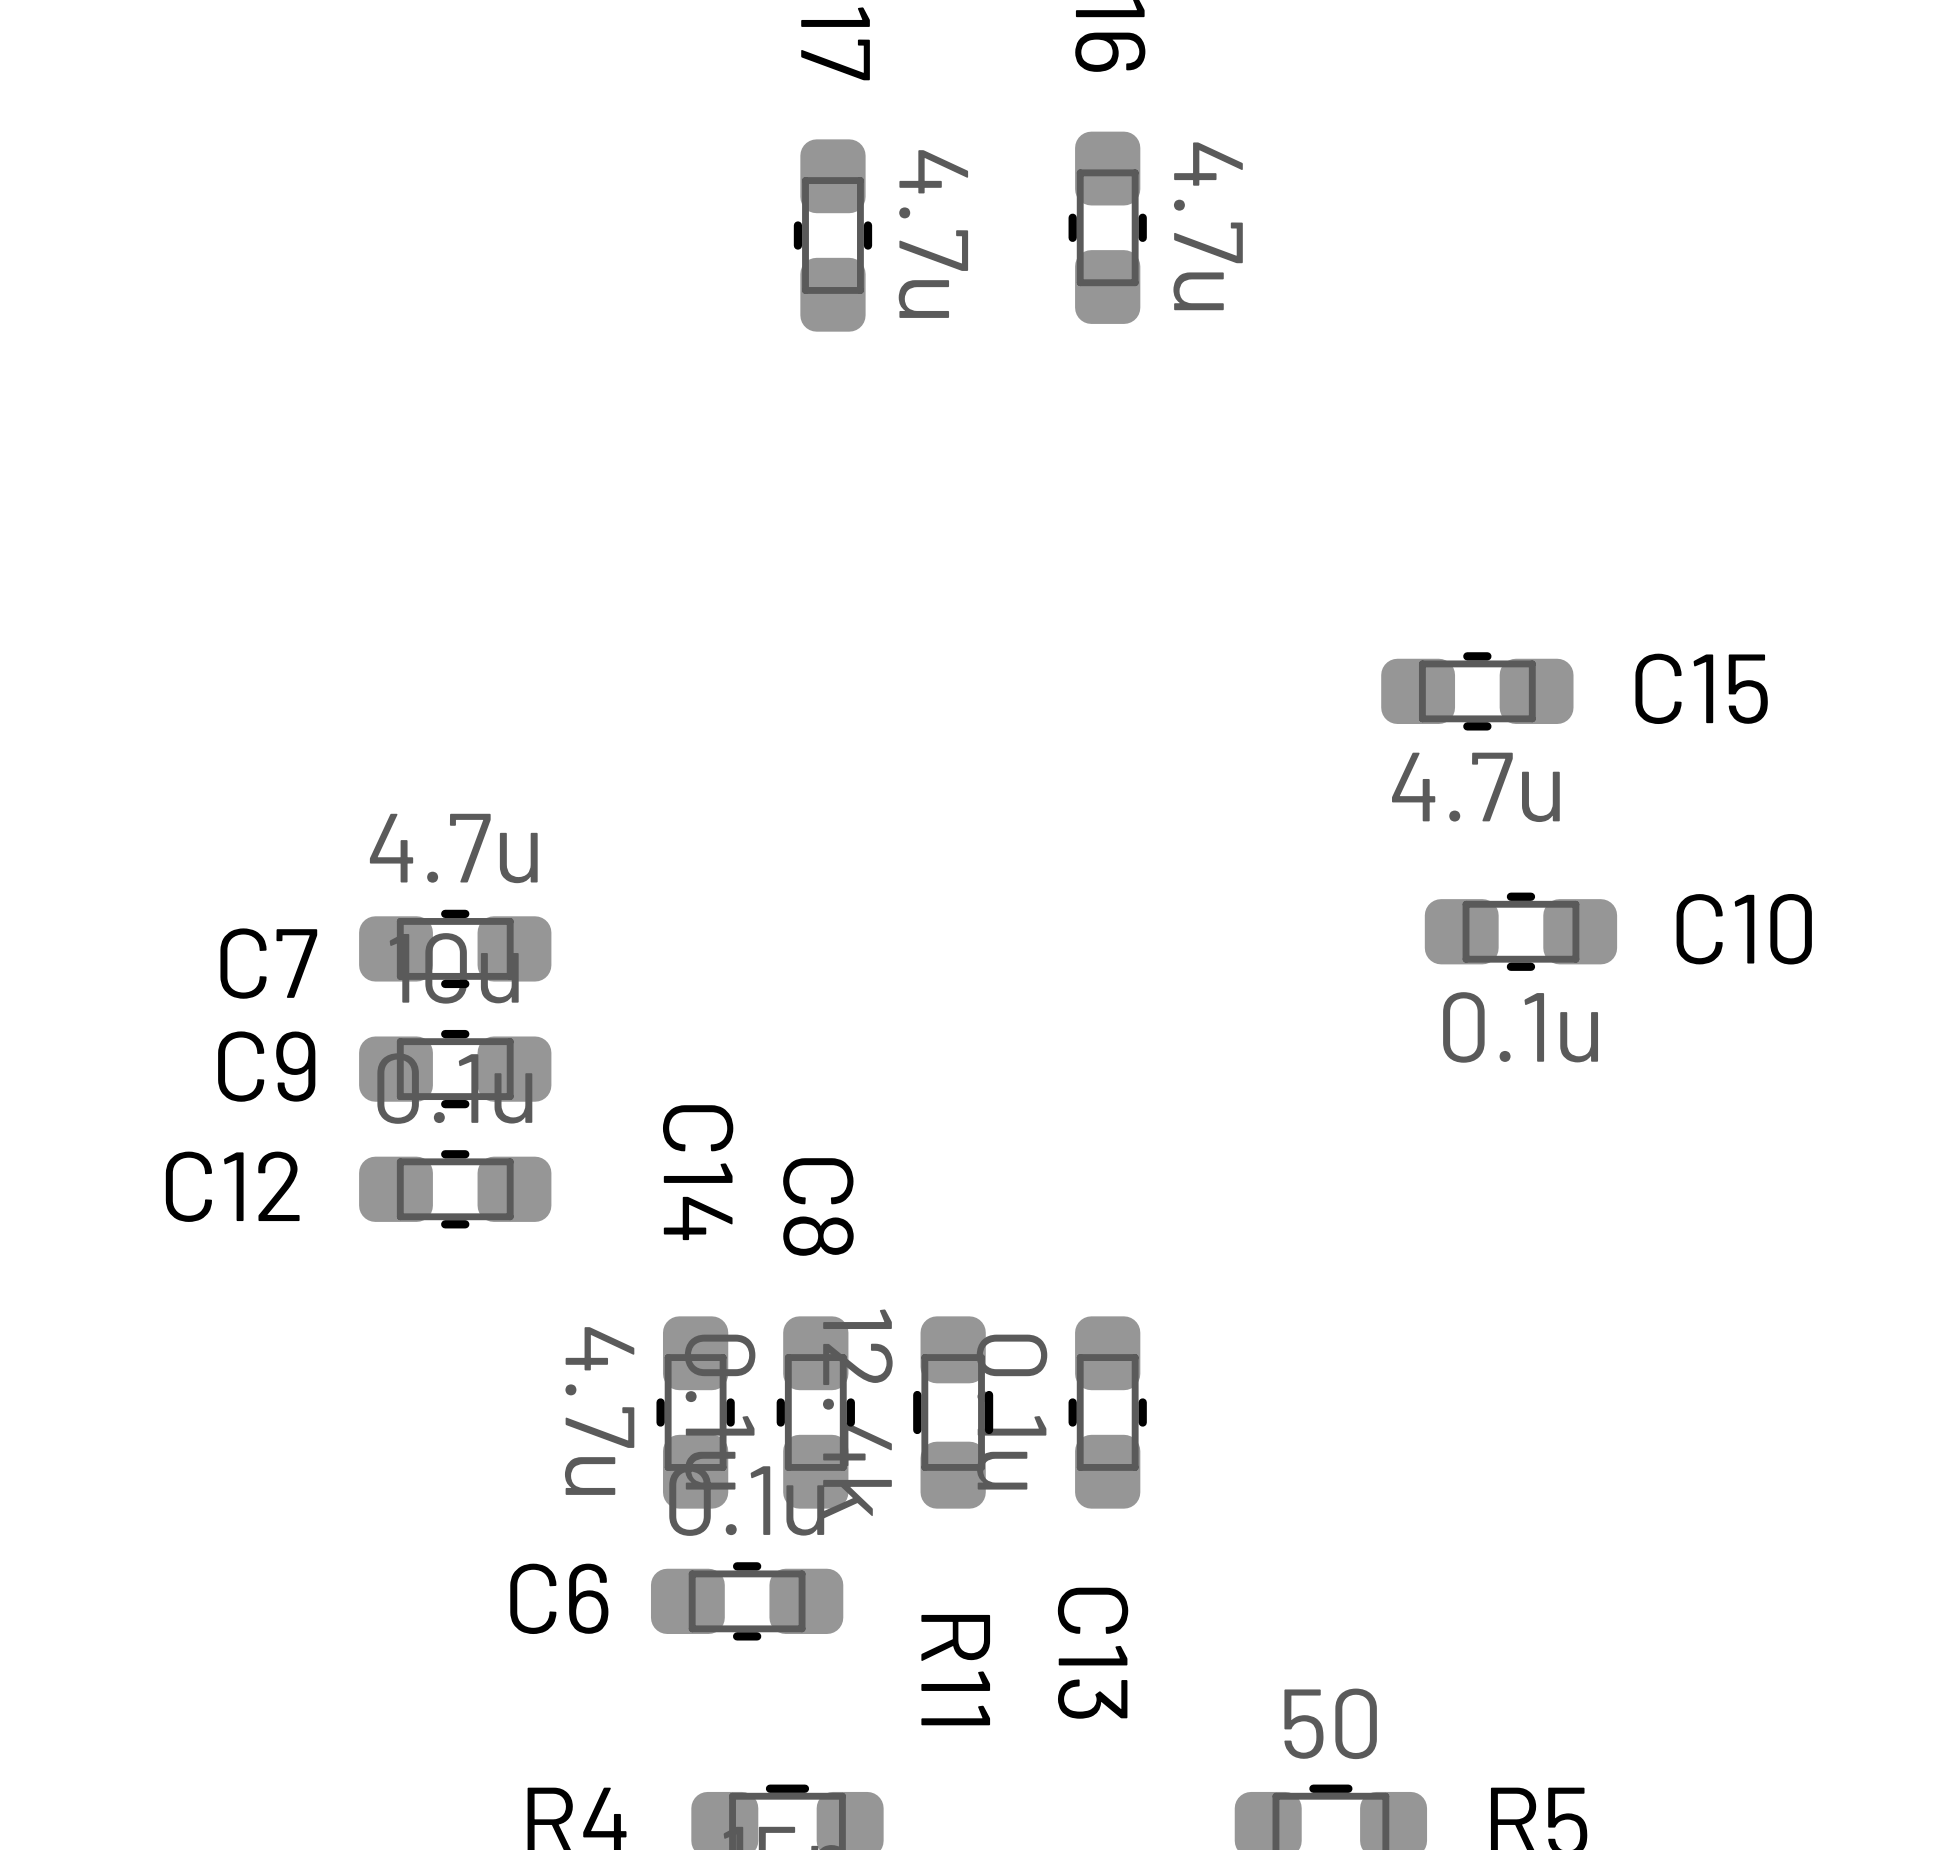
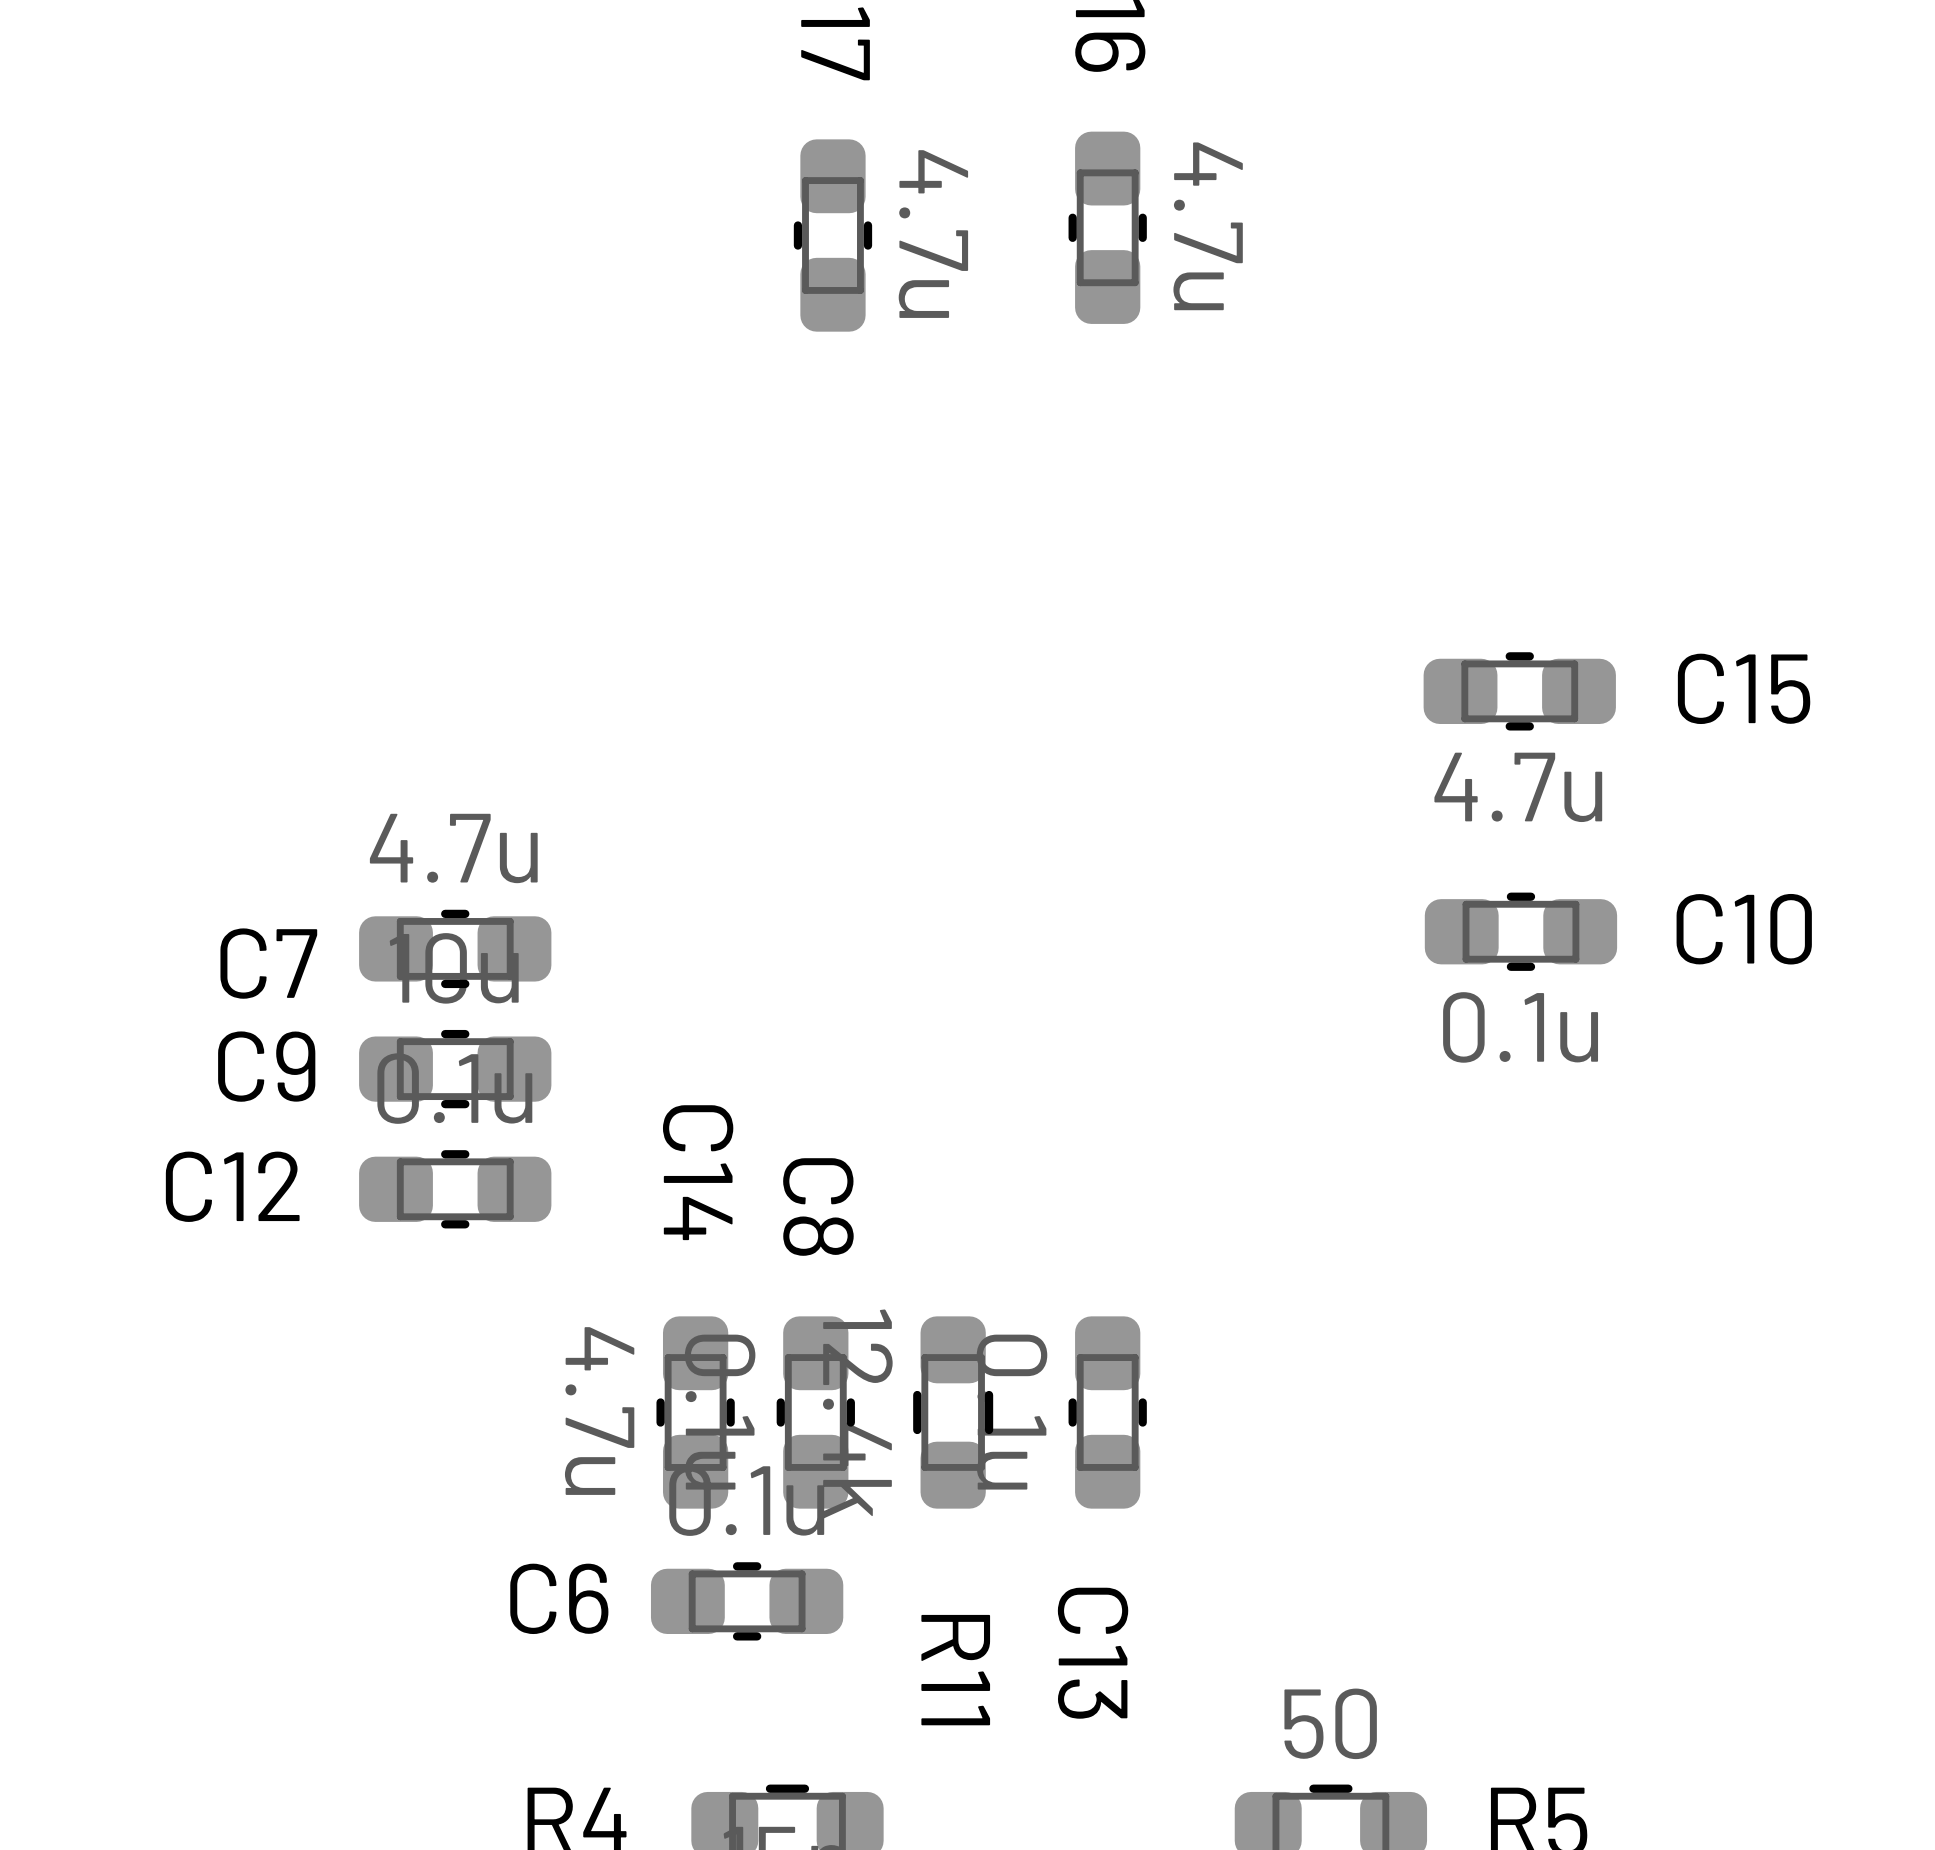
C15 position: (1477, 691) -> (1519, 691)

